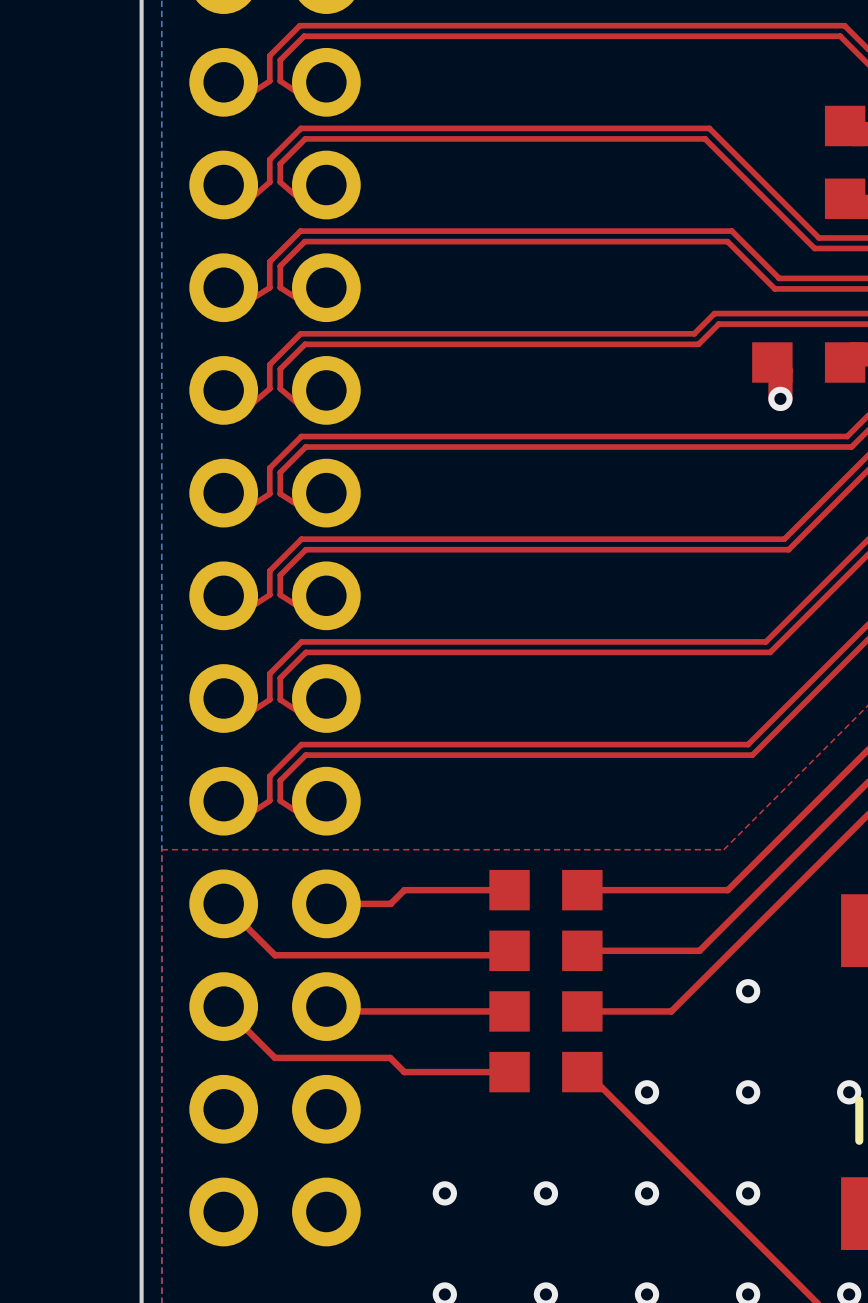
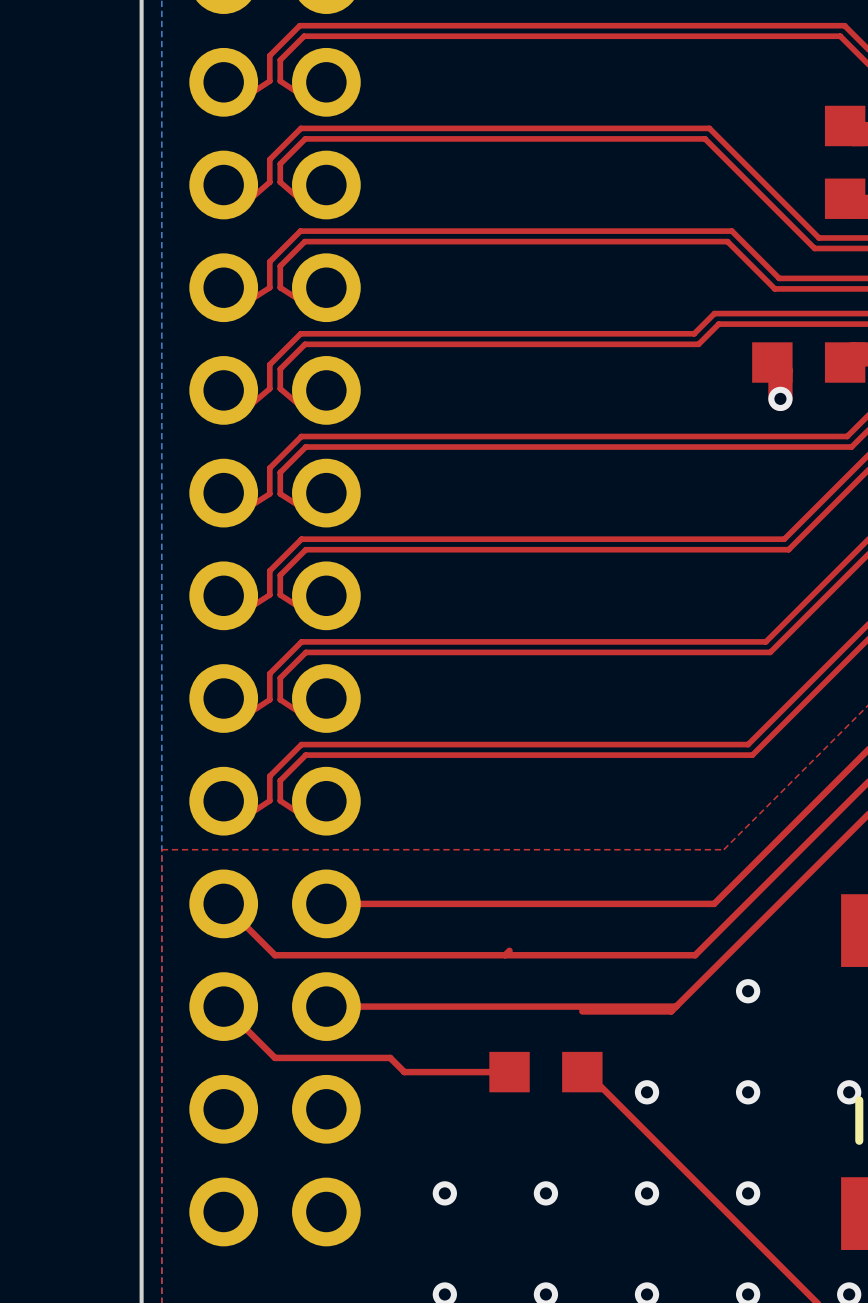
top track: (509, 890) (404, 890) (390, 903) -> none
part: (545, 890) -> none
top track: (582, 890) (727, 890) -> (390, 903) (714, 903) (727, 890)
part: (545, 950) -> none
top track: (582, 950) (699, 950) -> (505, 955) (695, 955) (699, 950)
top track: (326, 1006) (331, 1011) (509, 1011) -> (326, 1006) (676, 1006)
part: (545, 1011) -> none

